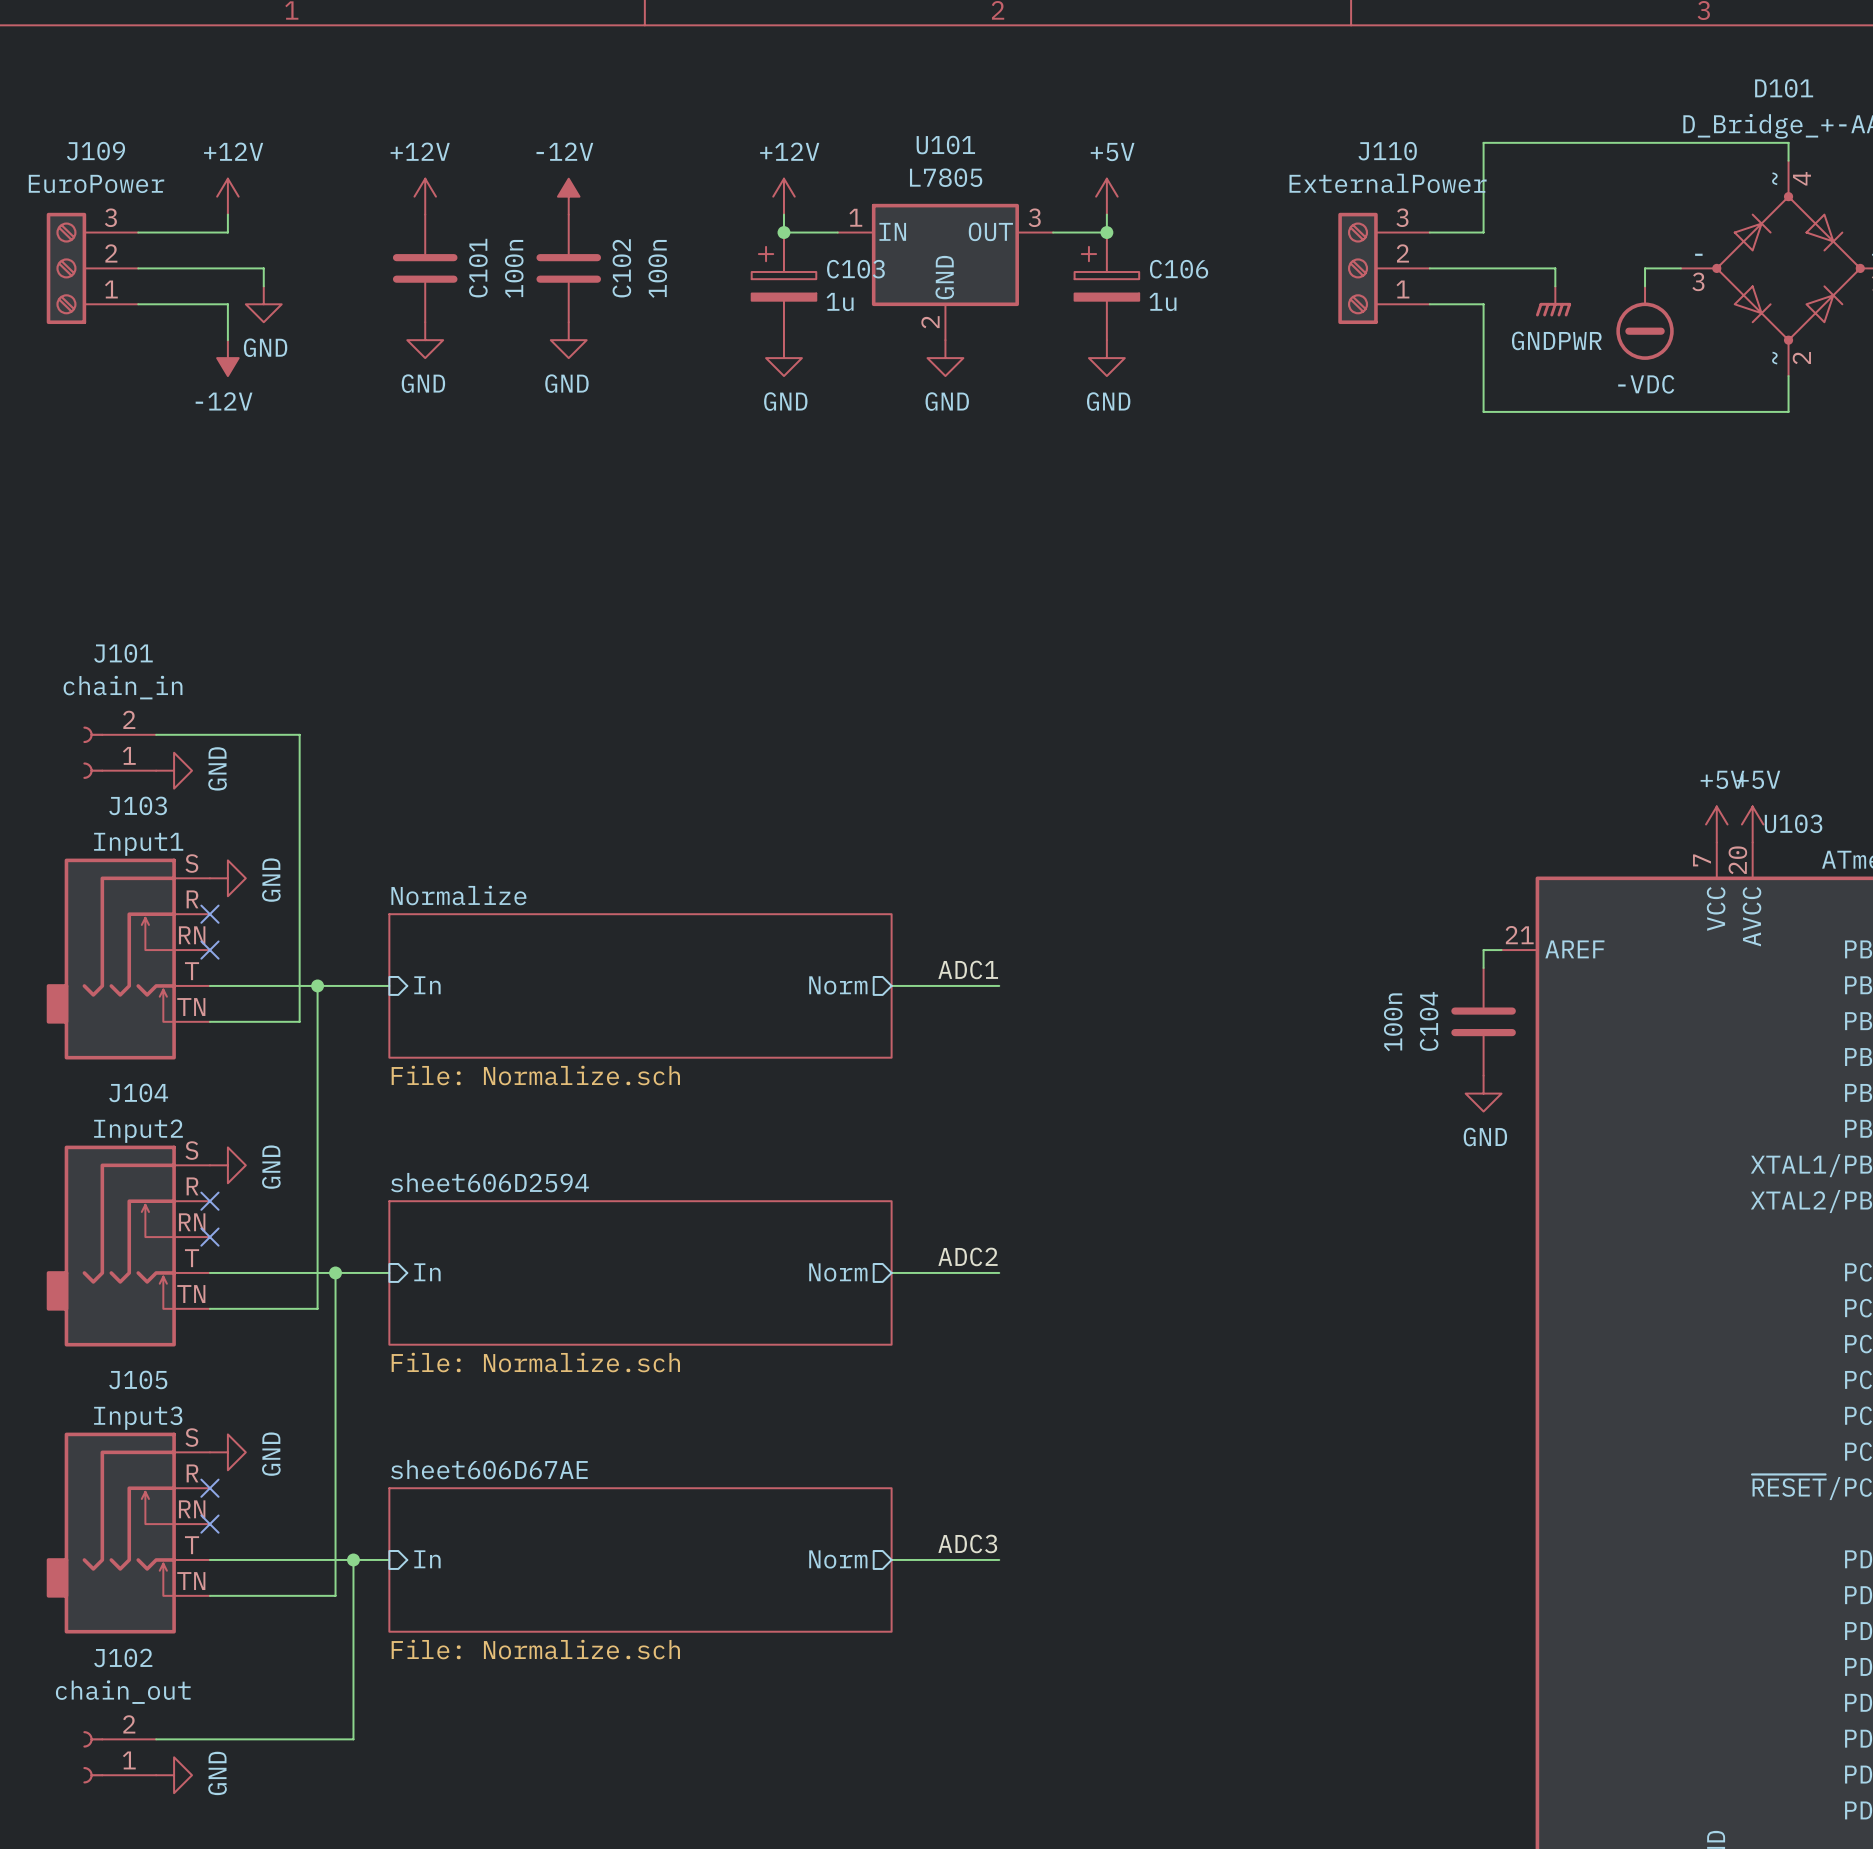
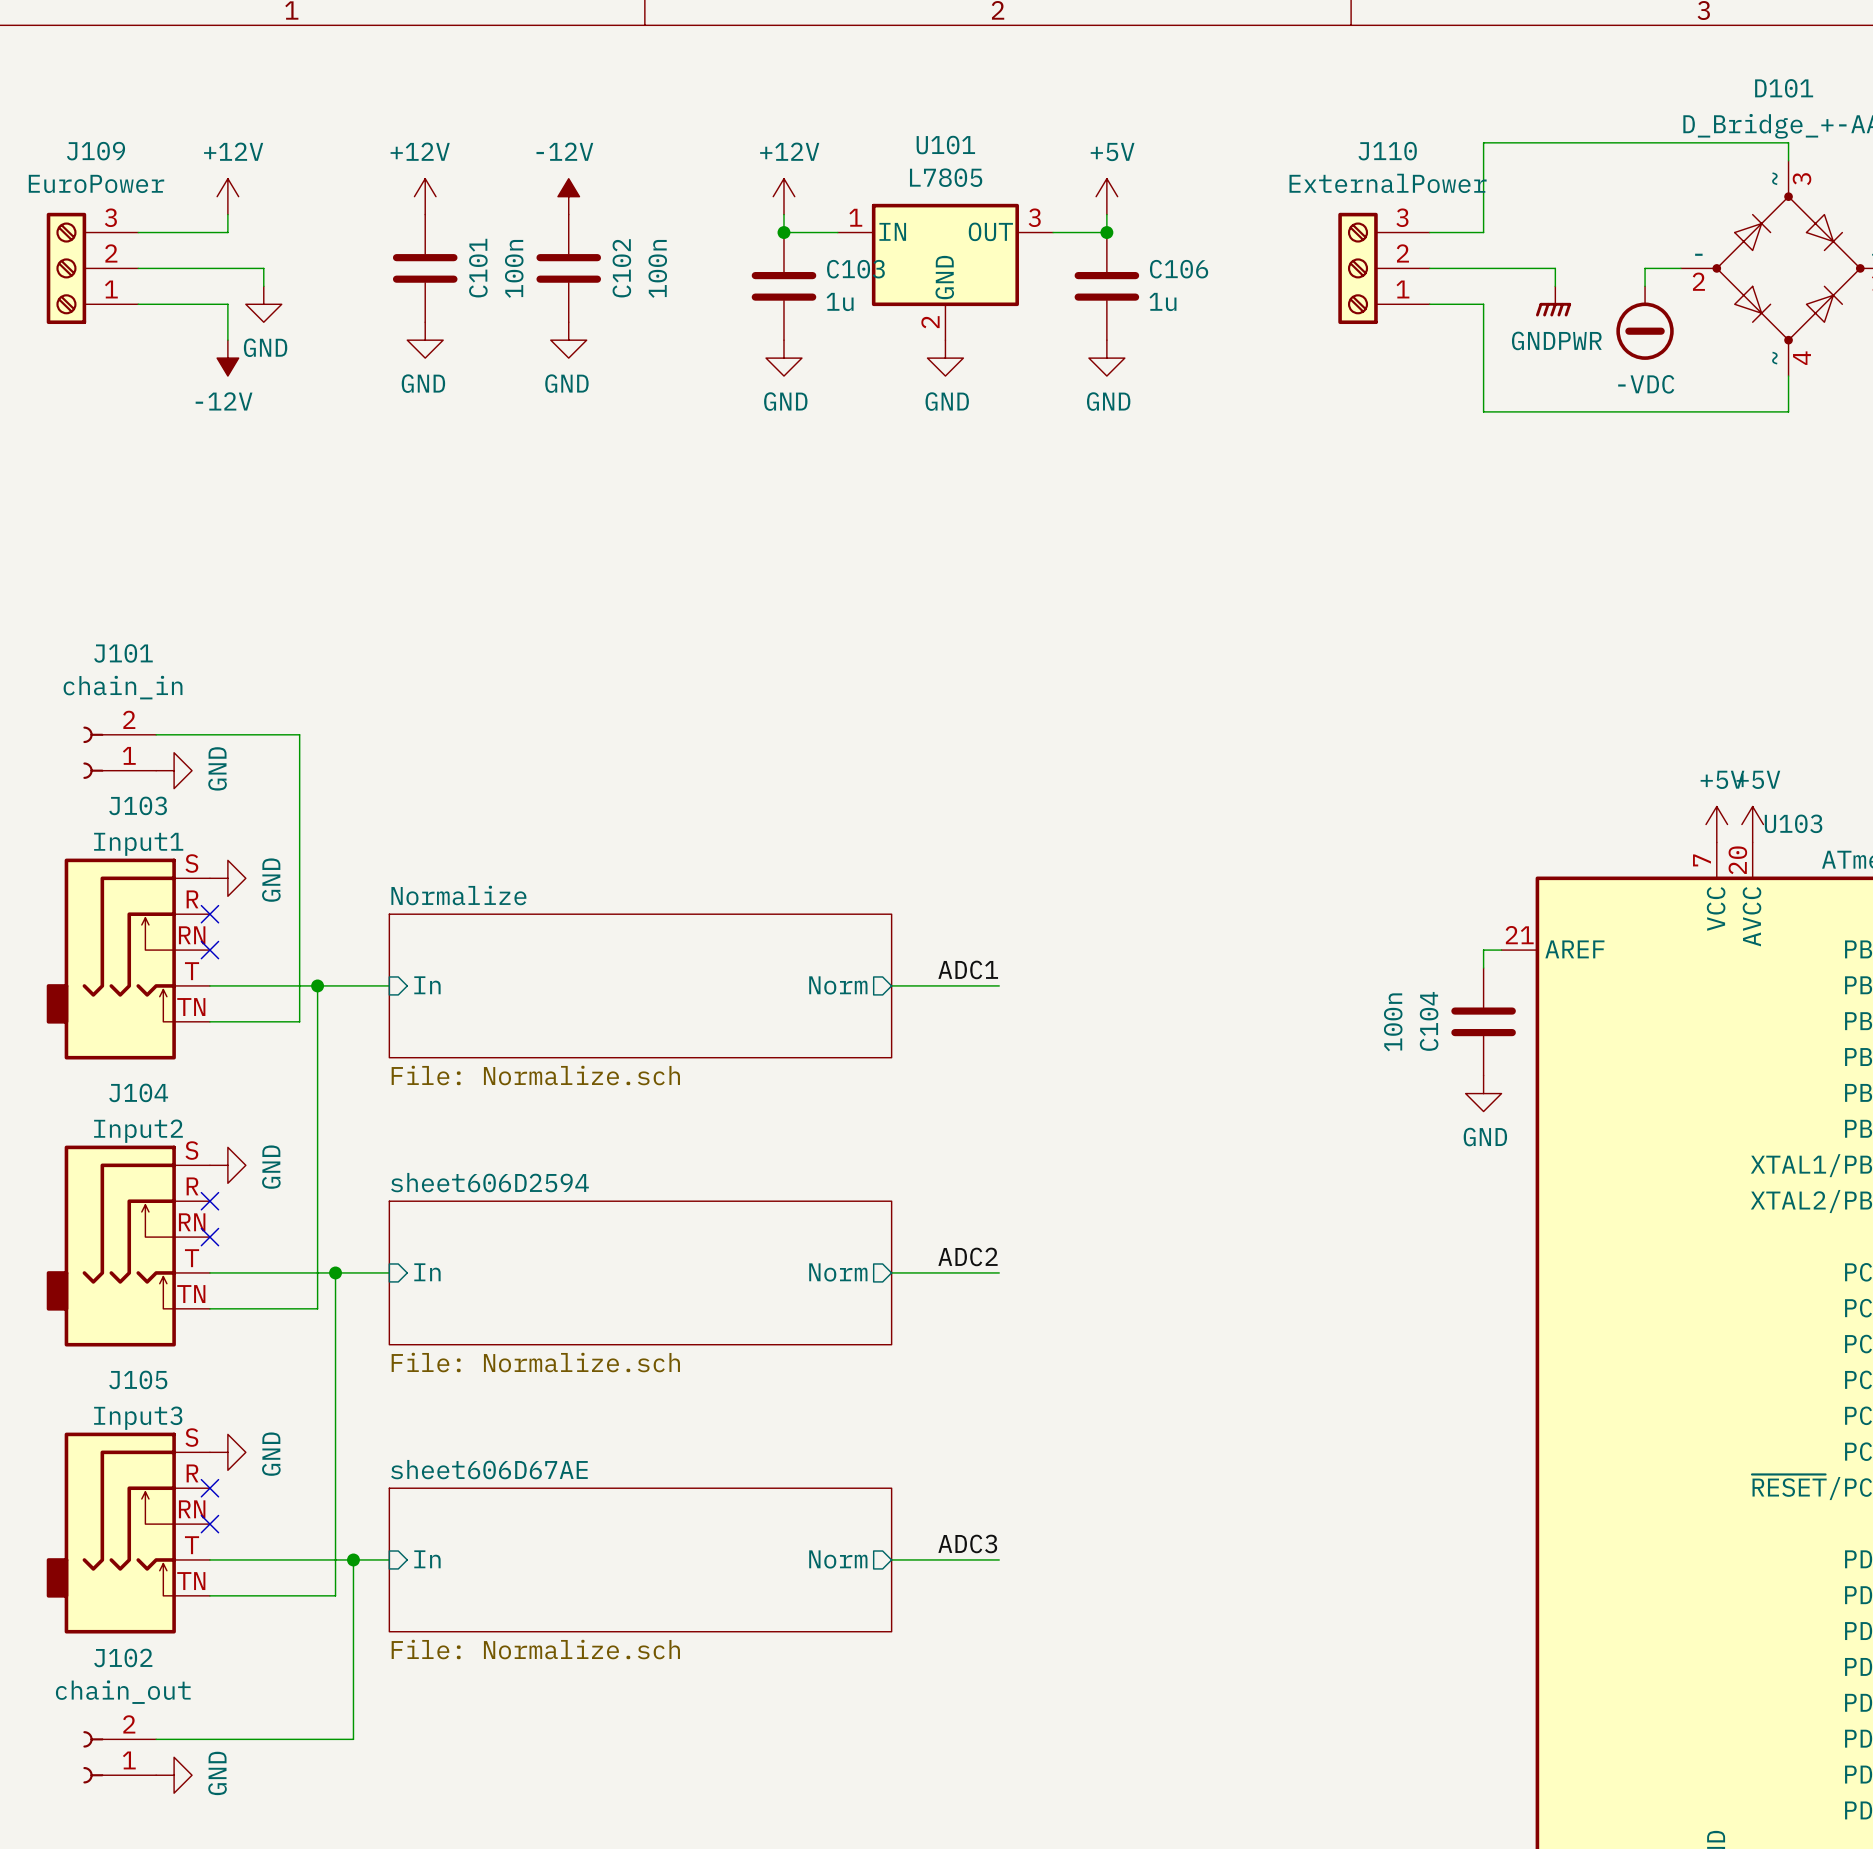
D101 pin number: 4 (1801, 178) -> 3 (1801, 179)
C103 symbol: [751, 232, 817, 341] -> [751, 232, 817, 341]
C106 symbol: [1074, 232, 1140, 341] -> [1074, 232, 1140, 341]
D101 pin number: 3 (1698, 281) -> 2 (1698, 281)
D101 pin number: 2 (1801, 358) -> 4 (1801, 358)

